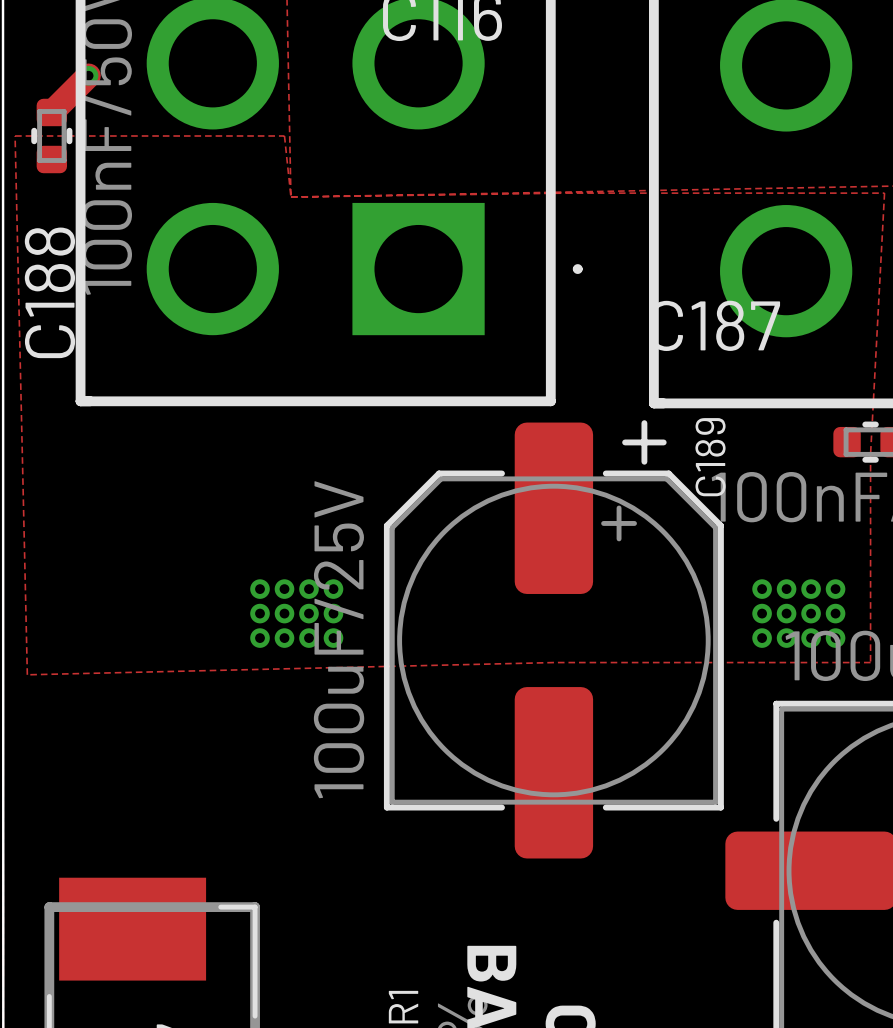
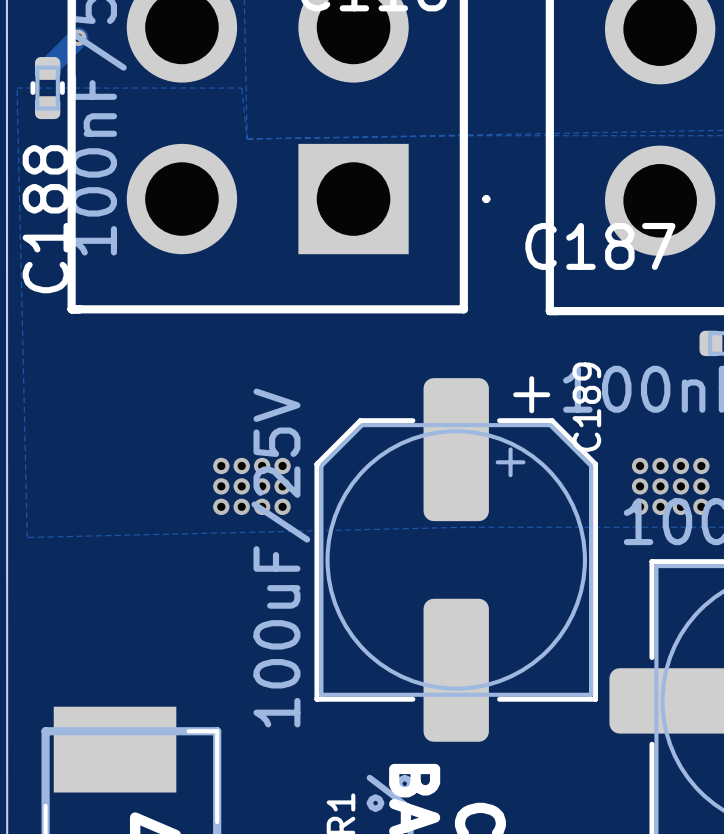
C189 position: (553, 639) -> (456, 558)

